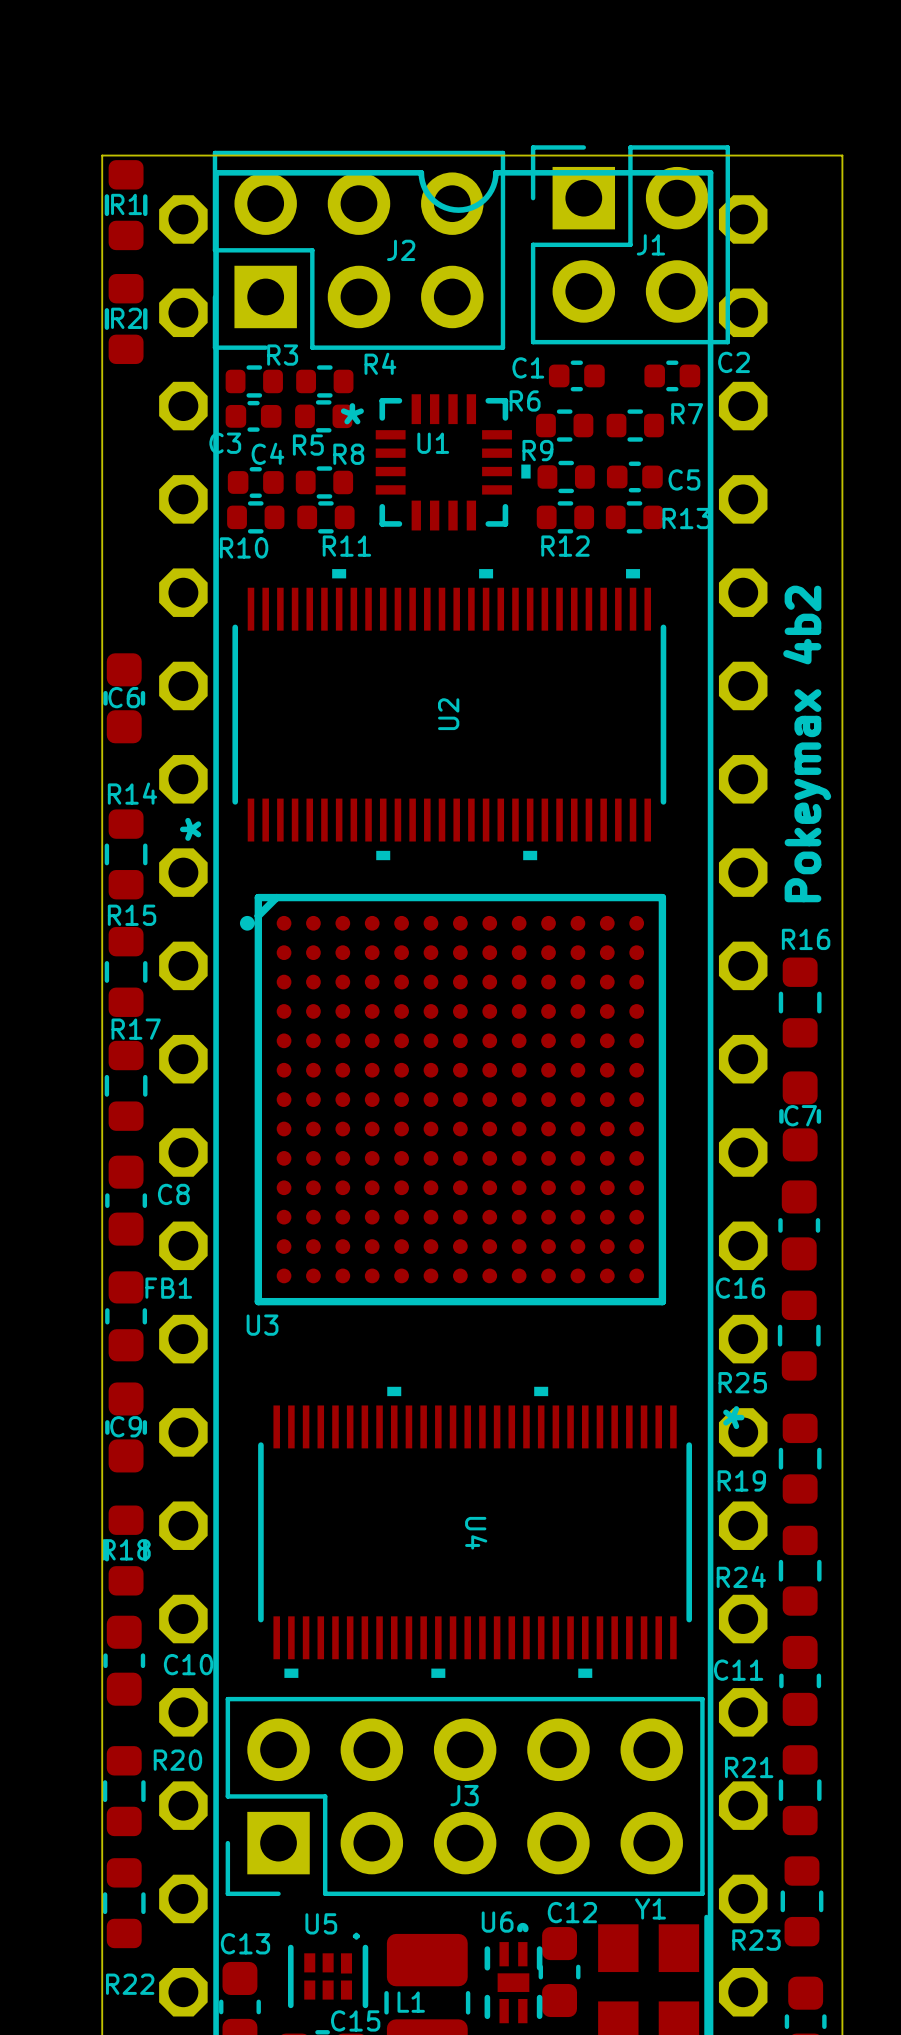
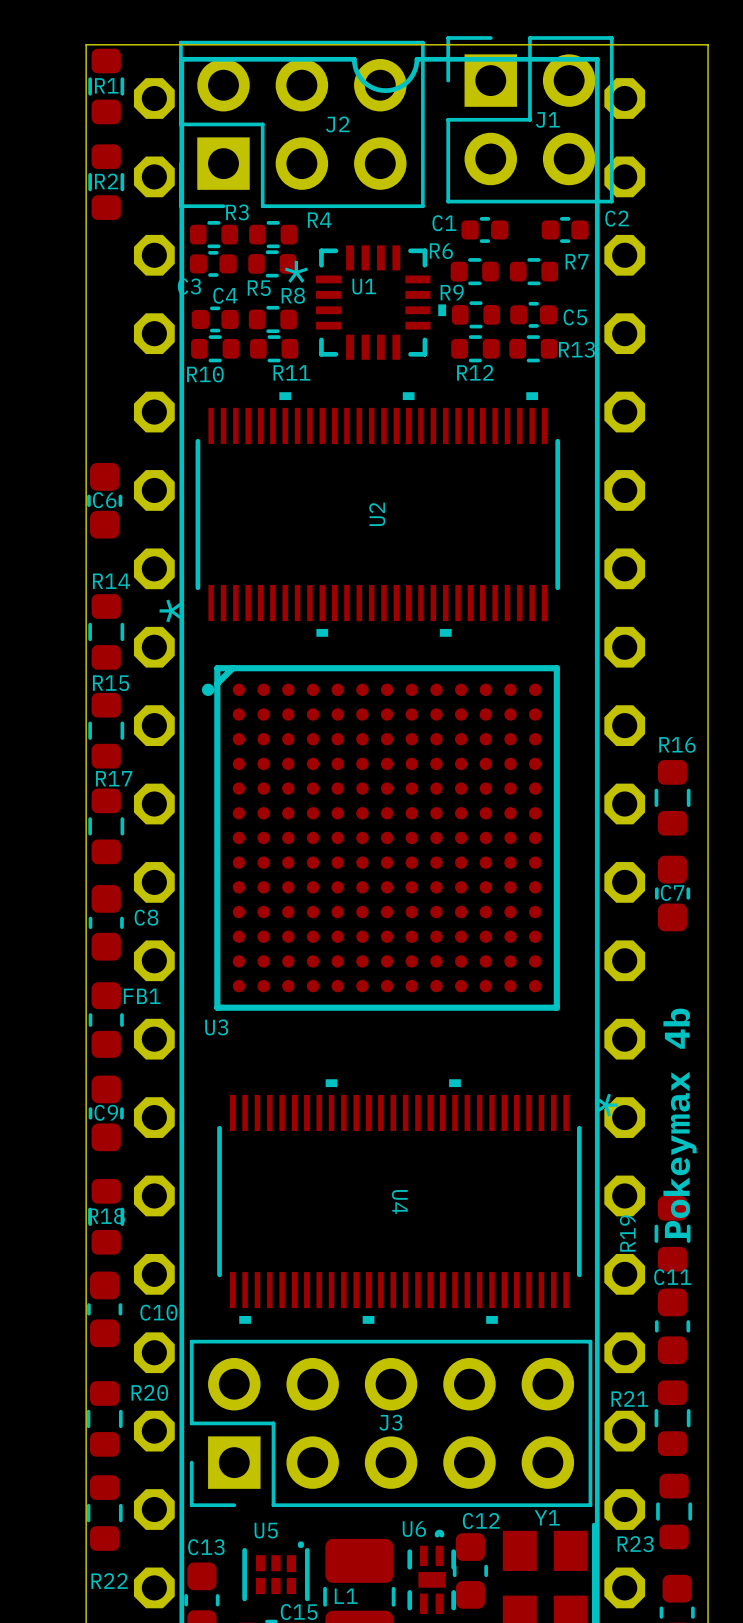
text: Pokeymax 4b2 (807, 743) -> none
R16 position: (800, 1002) -> (672, 797)
C7 position: (800, 1116) -> (672, 893)
C16: (799, 1225) -> none
R25: (799, 1335) -> none
text: none -> Pokeymax 4b (680, 1123)
R19: (800, 1458) -> none
R24 name: R24 (741, 1576) -> R19 (627, 1233)
C11 name position: C11 (738, 1670) -> C11 (672, 1277)

